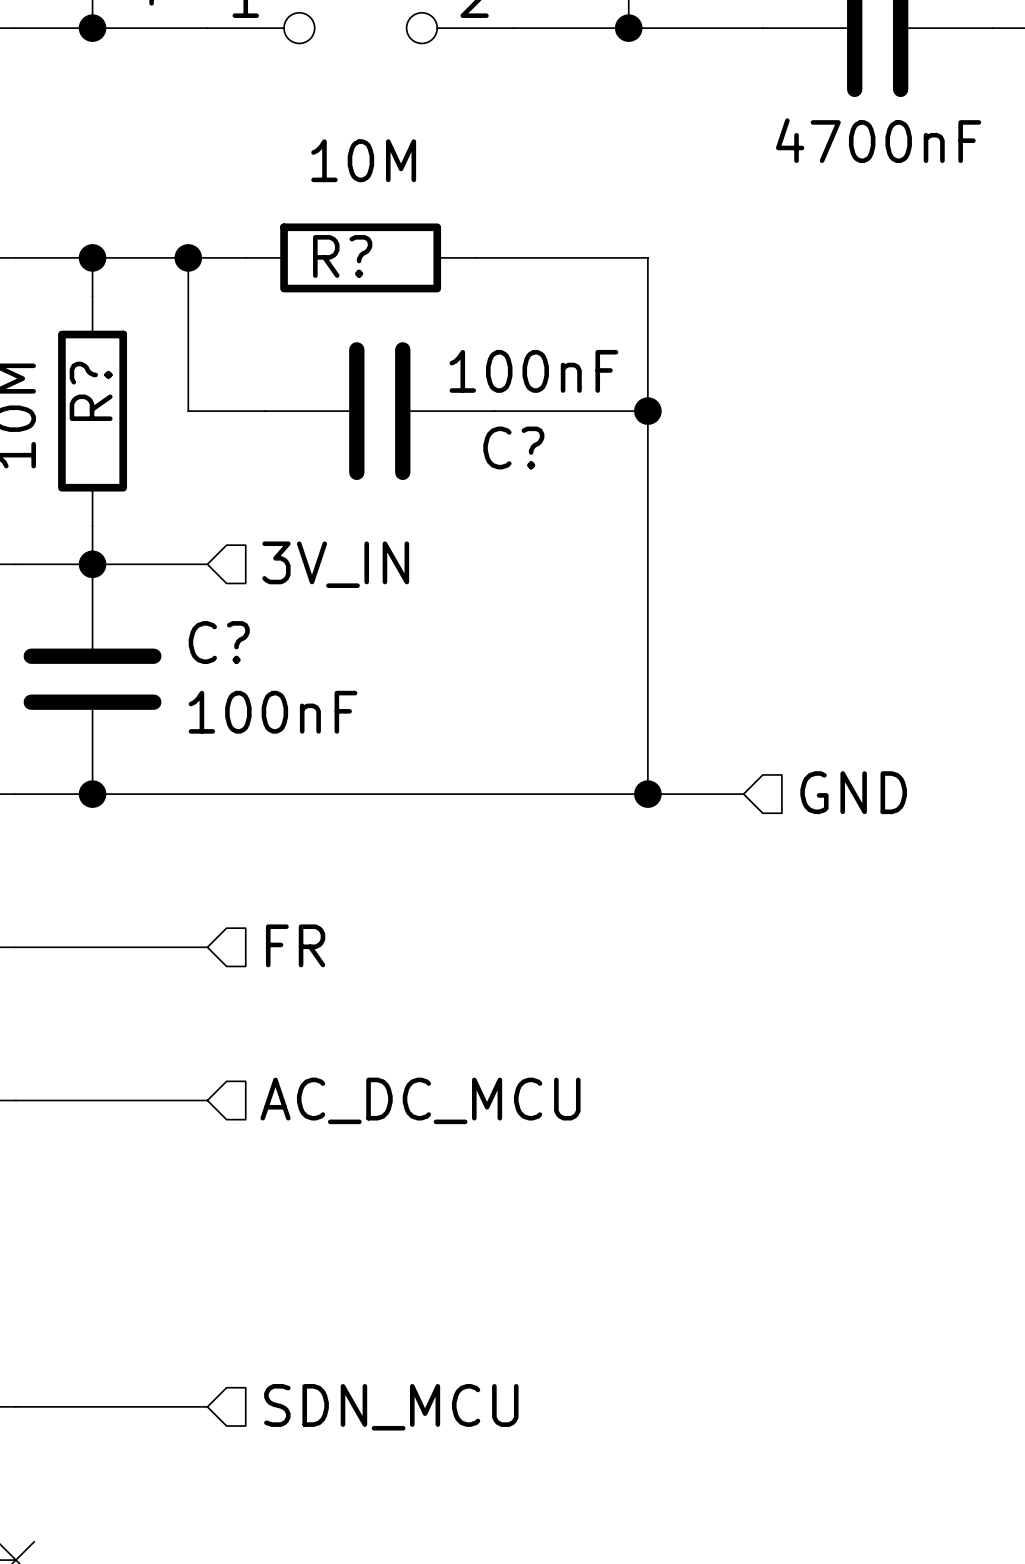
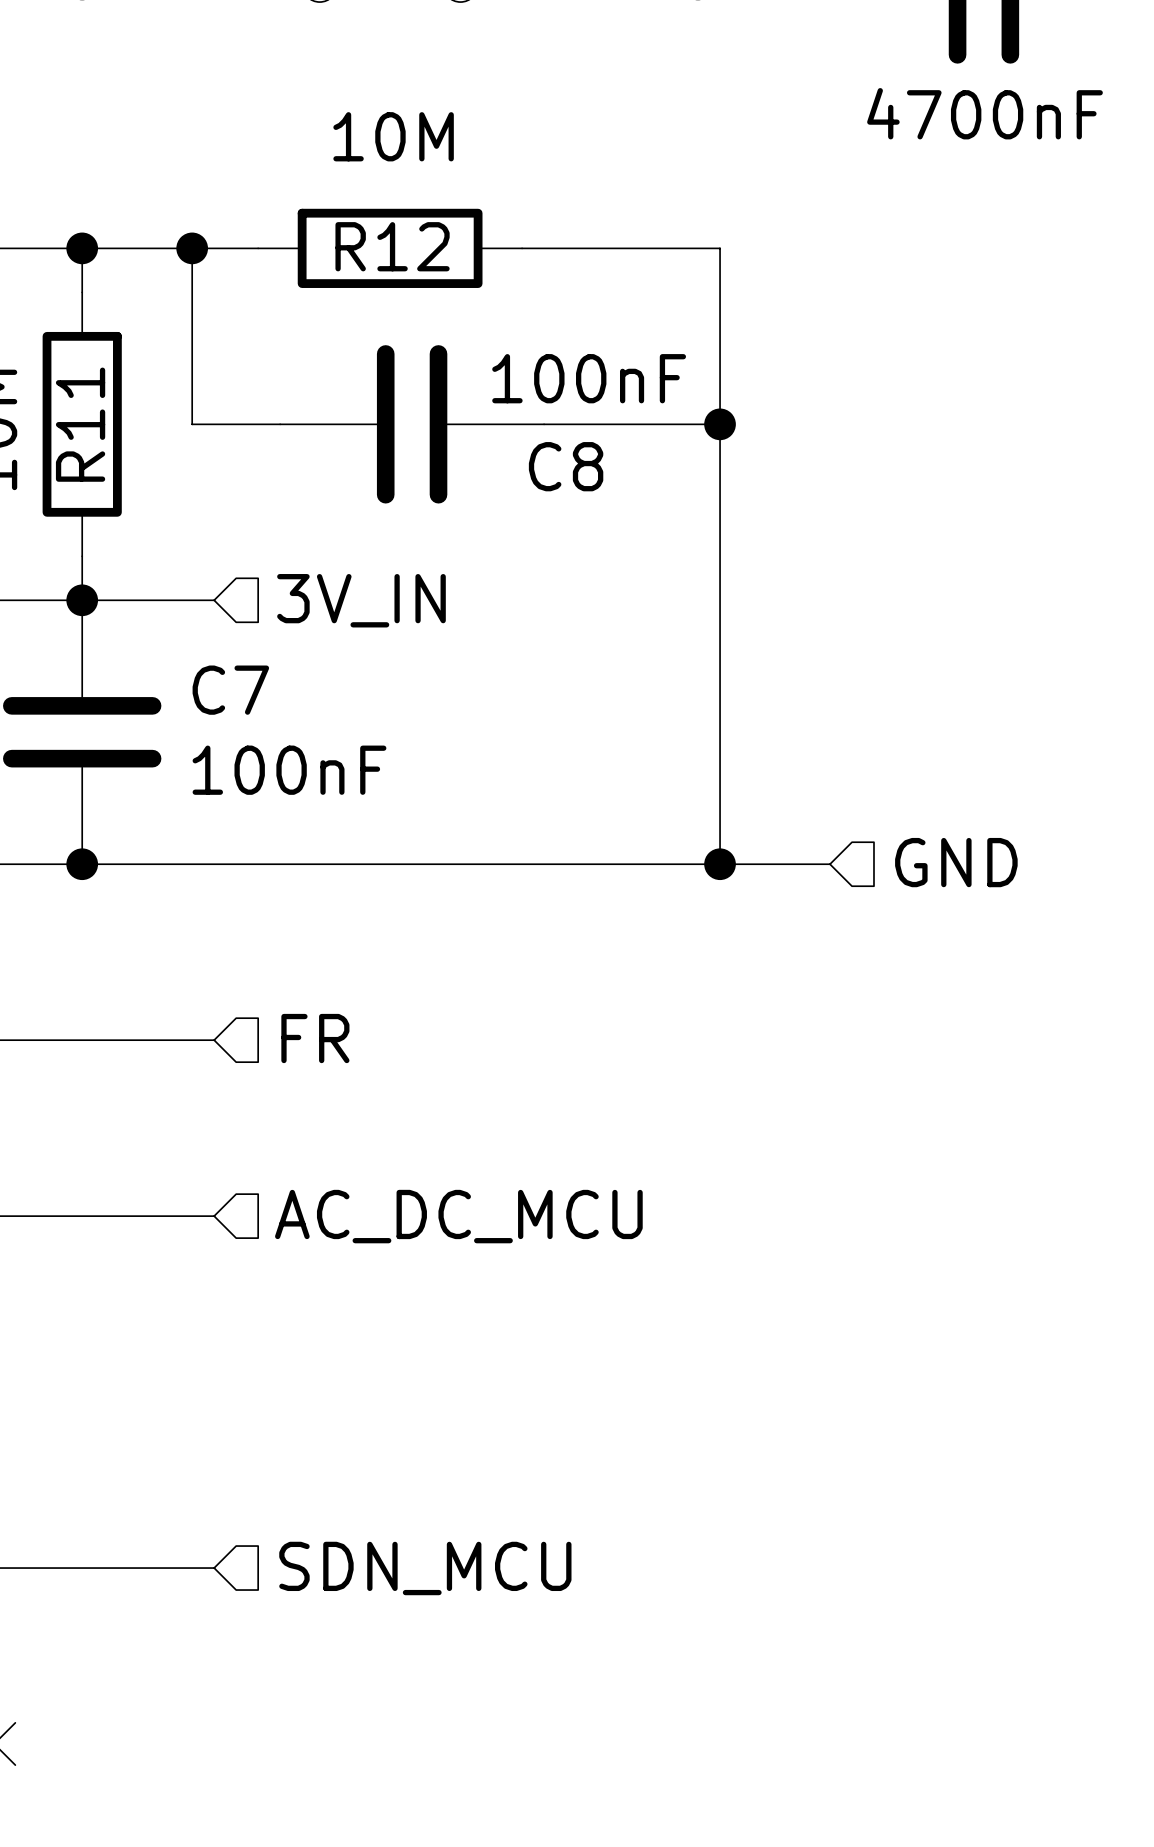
R? name: R? (342, 256) -> R12 (392, 246)
R? name: R? (91, 391) -> R11 (80, 424)
C? name: C? (513, 447) -> C8 (566, 466)
C? name: C? (219, 642) -> C7 (230, 690)

